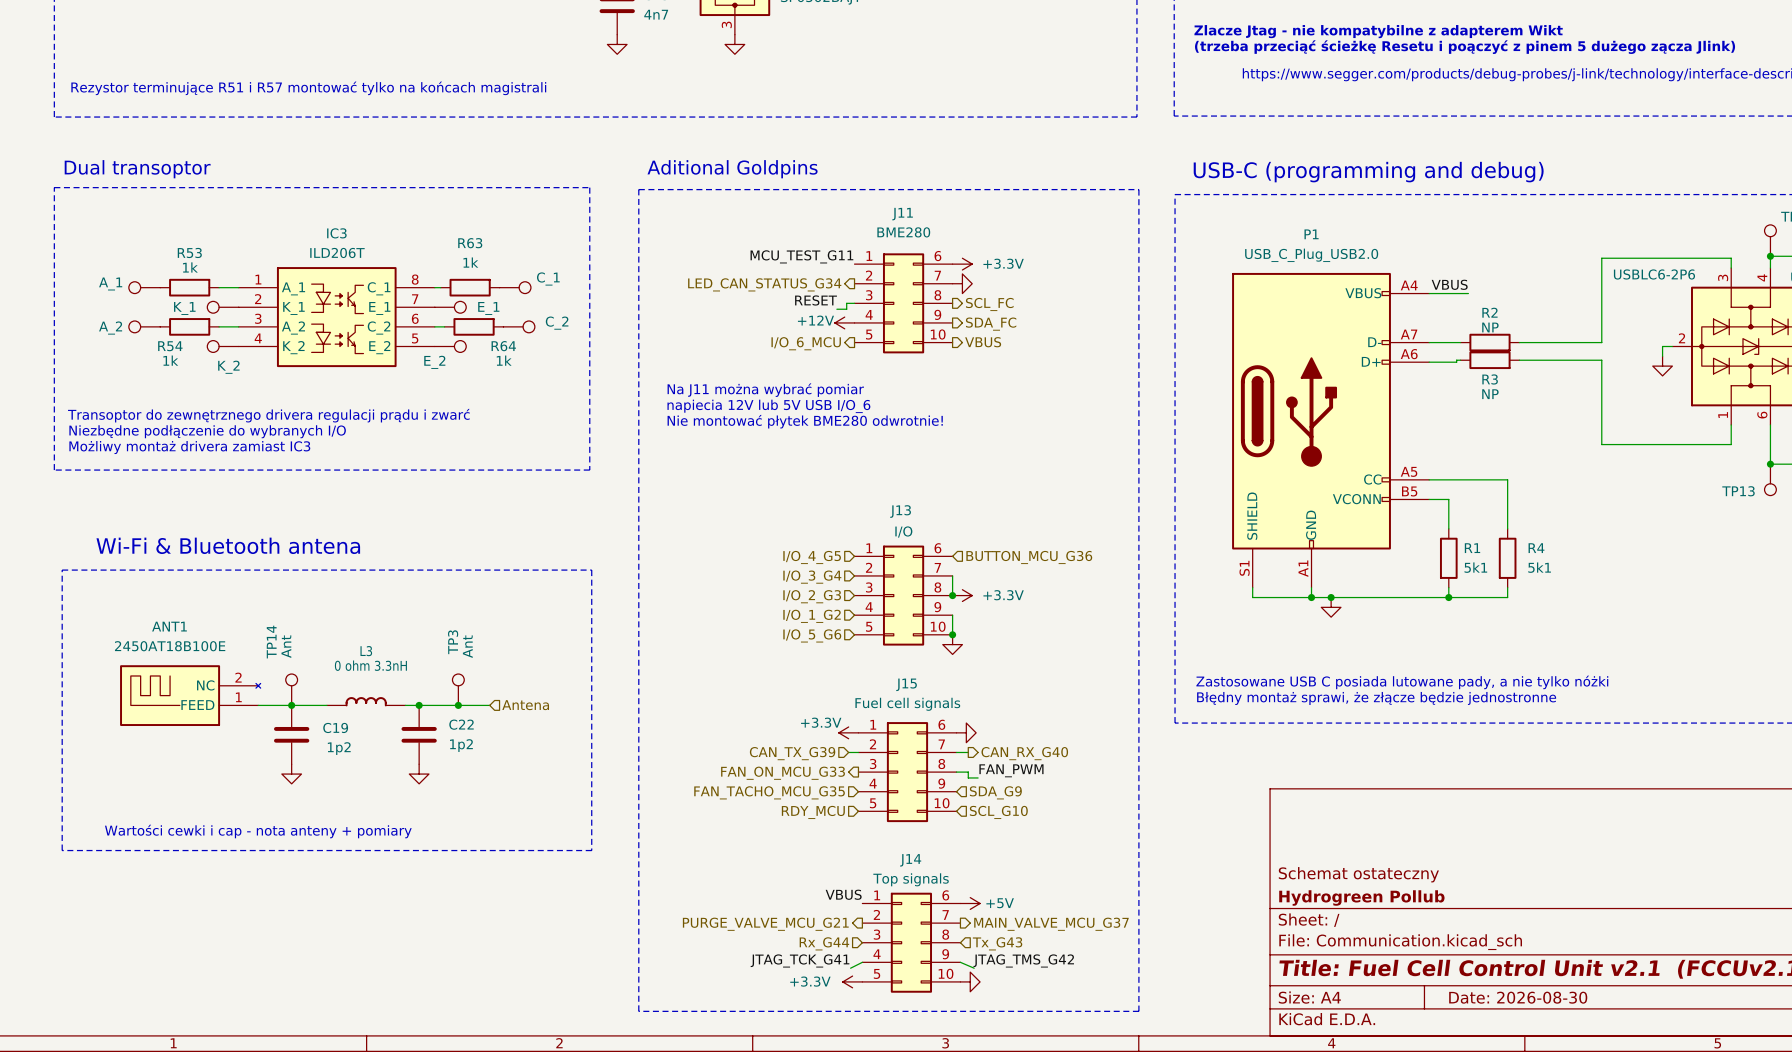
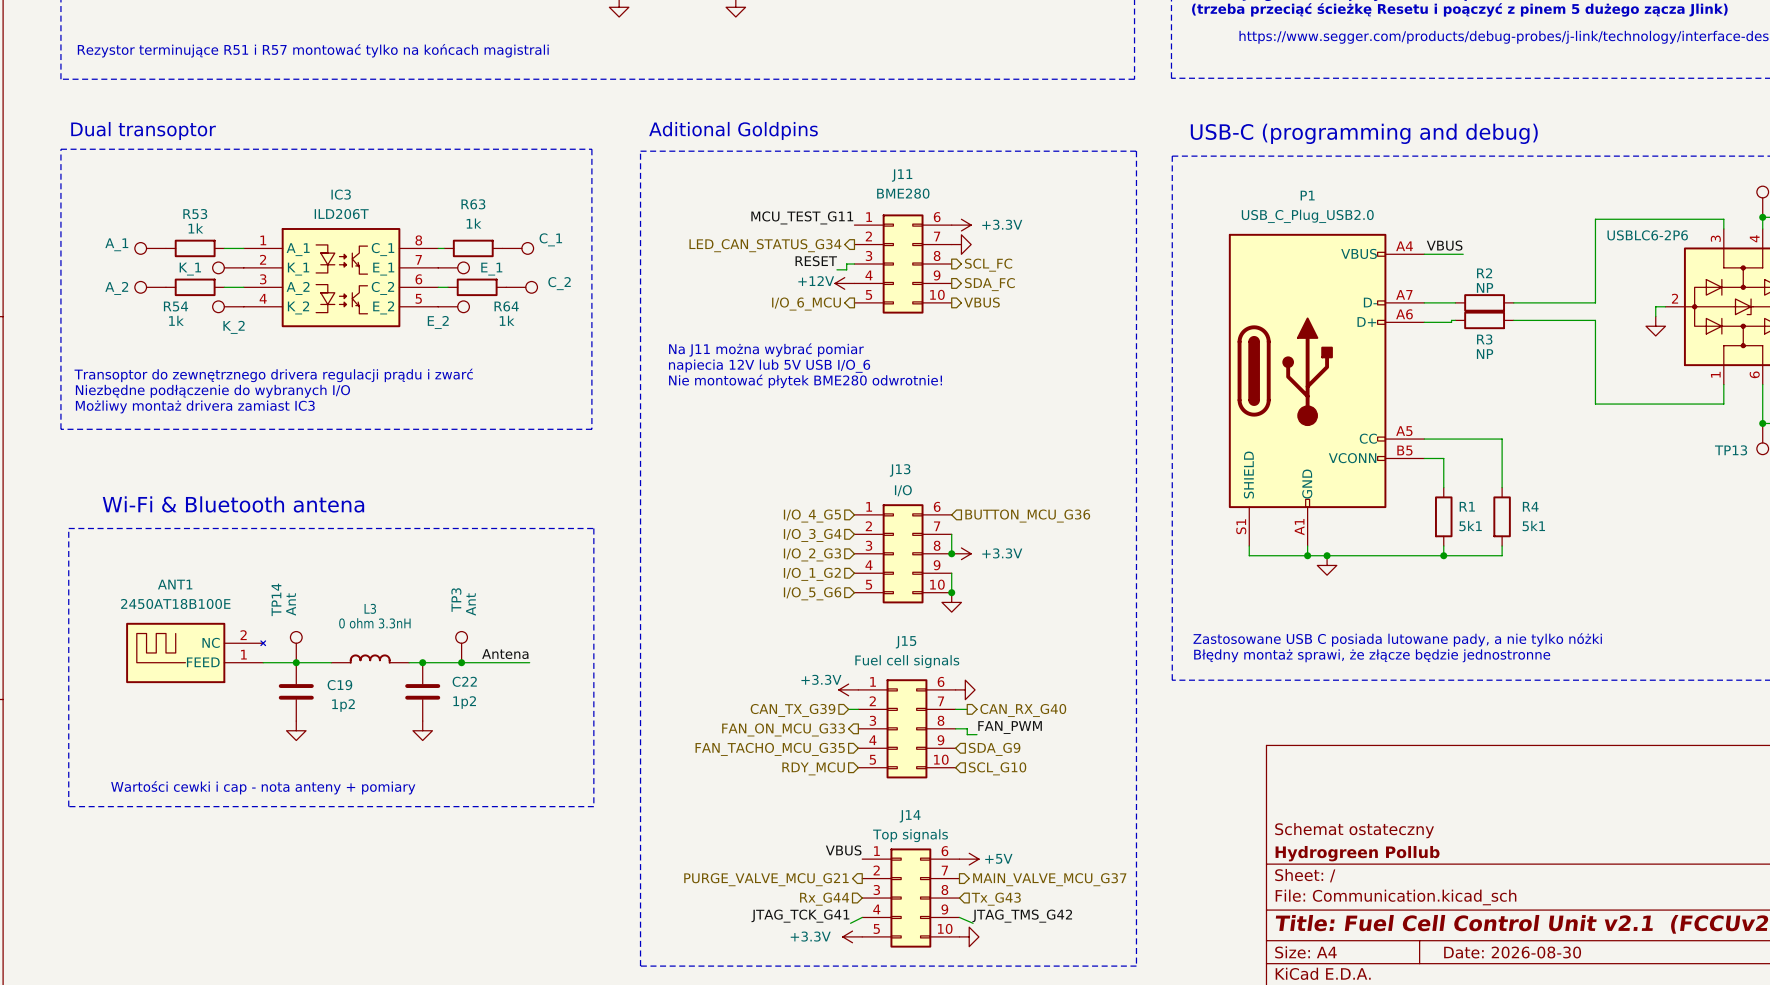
label: none -> Antena (505, 654)
wire: none -> (492, 662) (529, 662)
hierarchical label: Antena (525, 705) -> none

